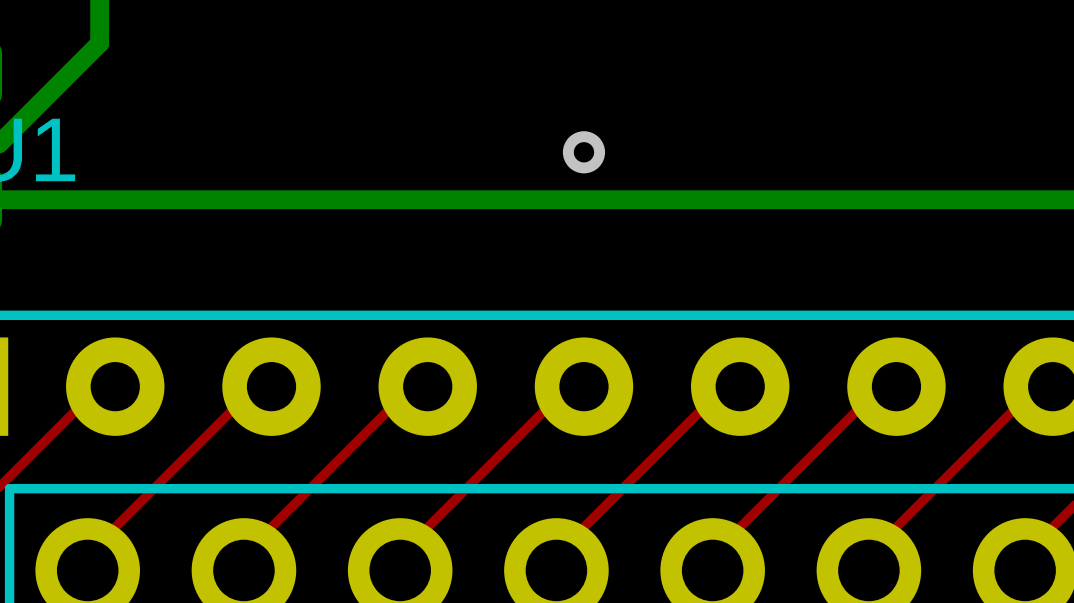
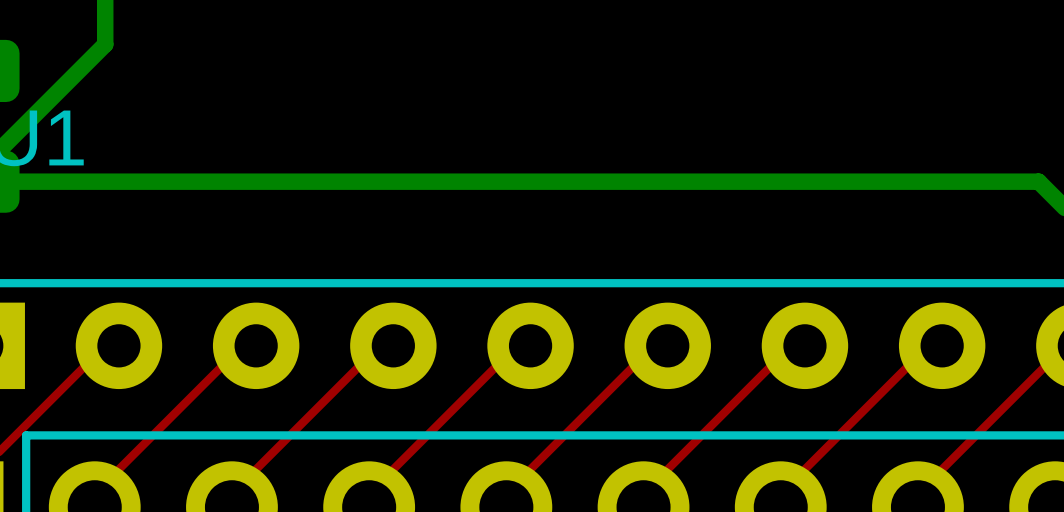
via: (583, 152) -> none

